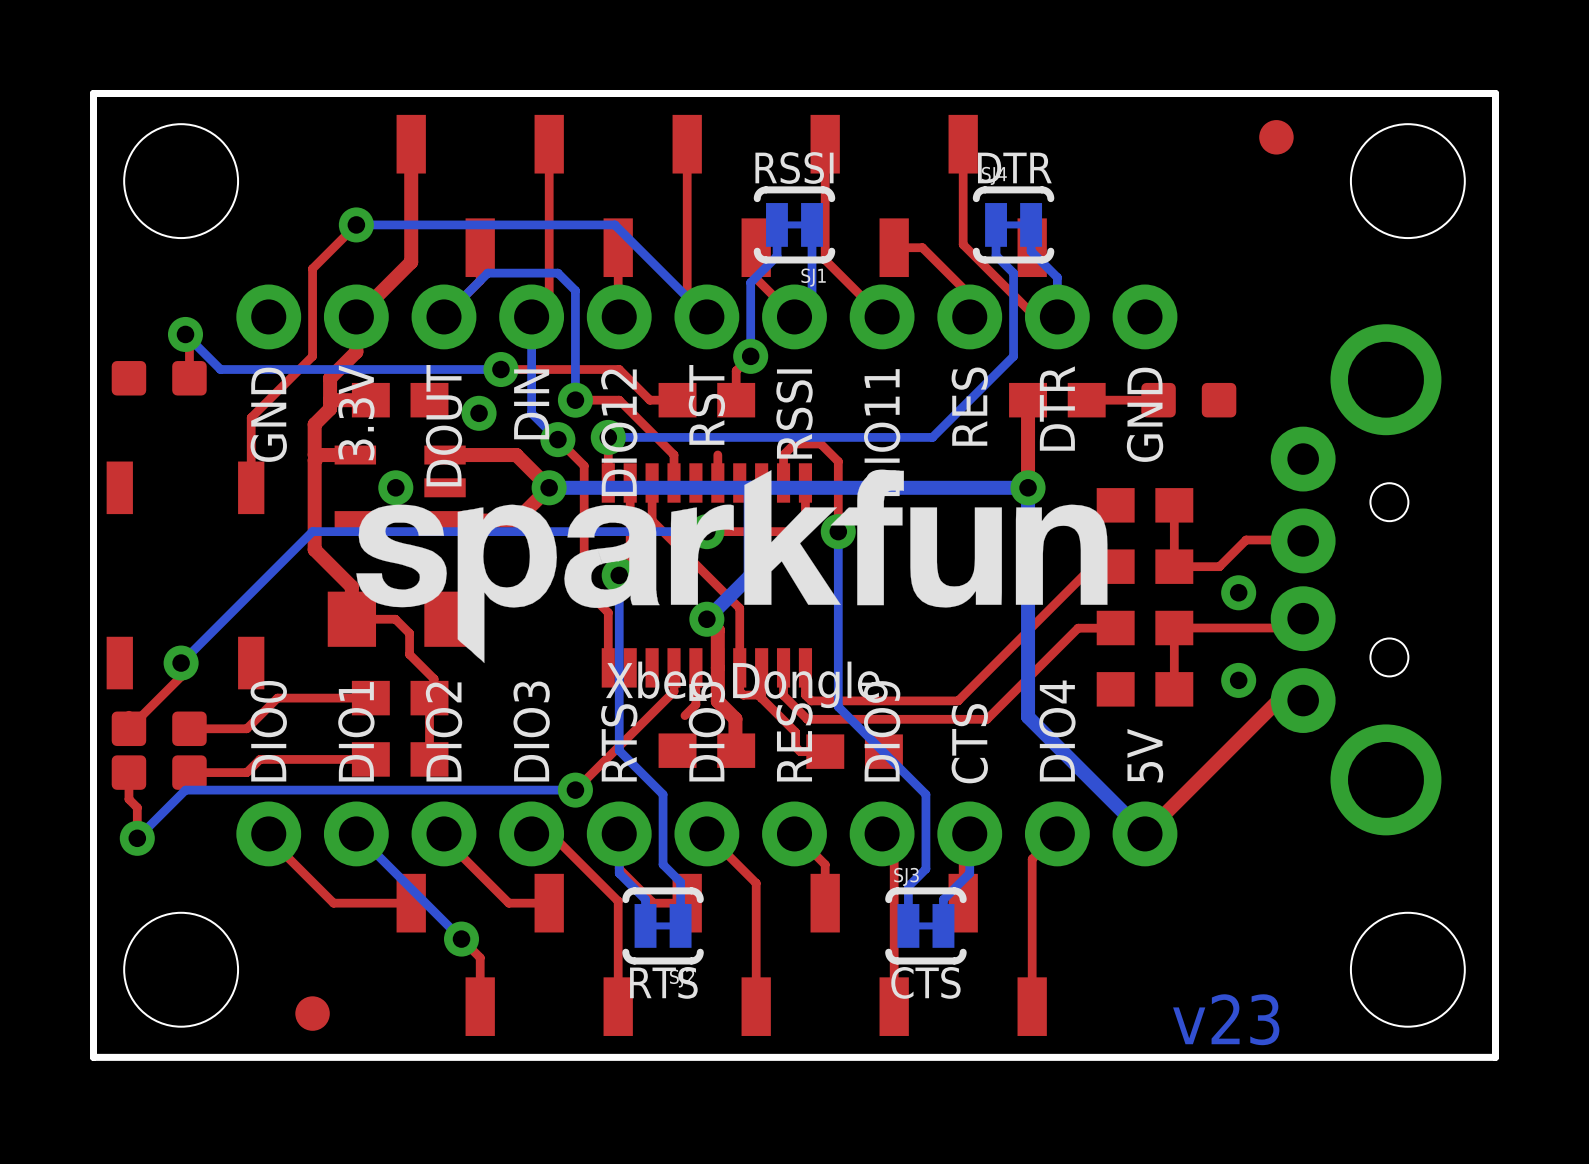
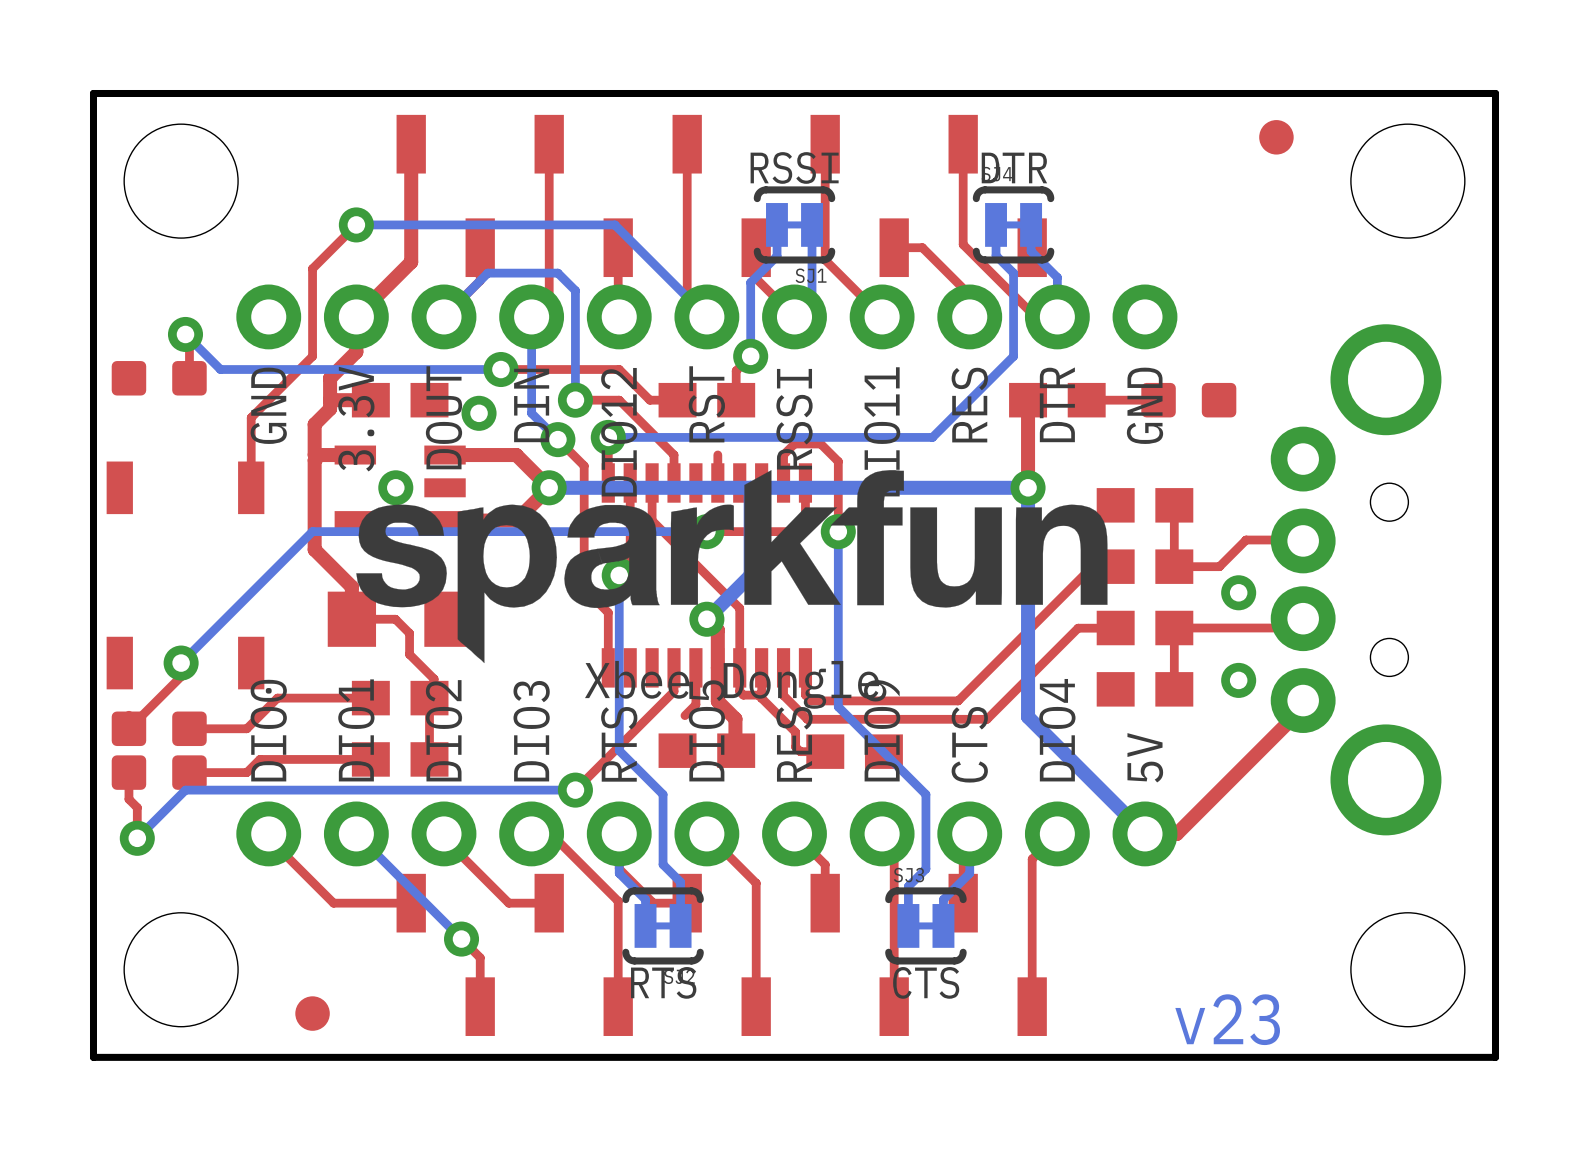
top track: (1303, 700) (1278, 700) (1144, 833) -> (1310, 700) (1176, 833) (1144, 833)

